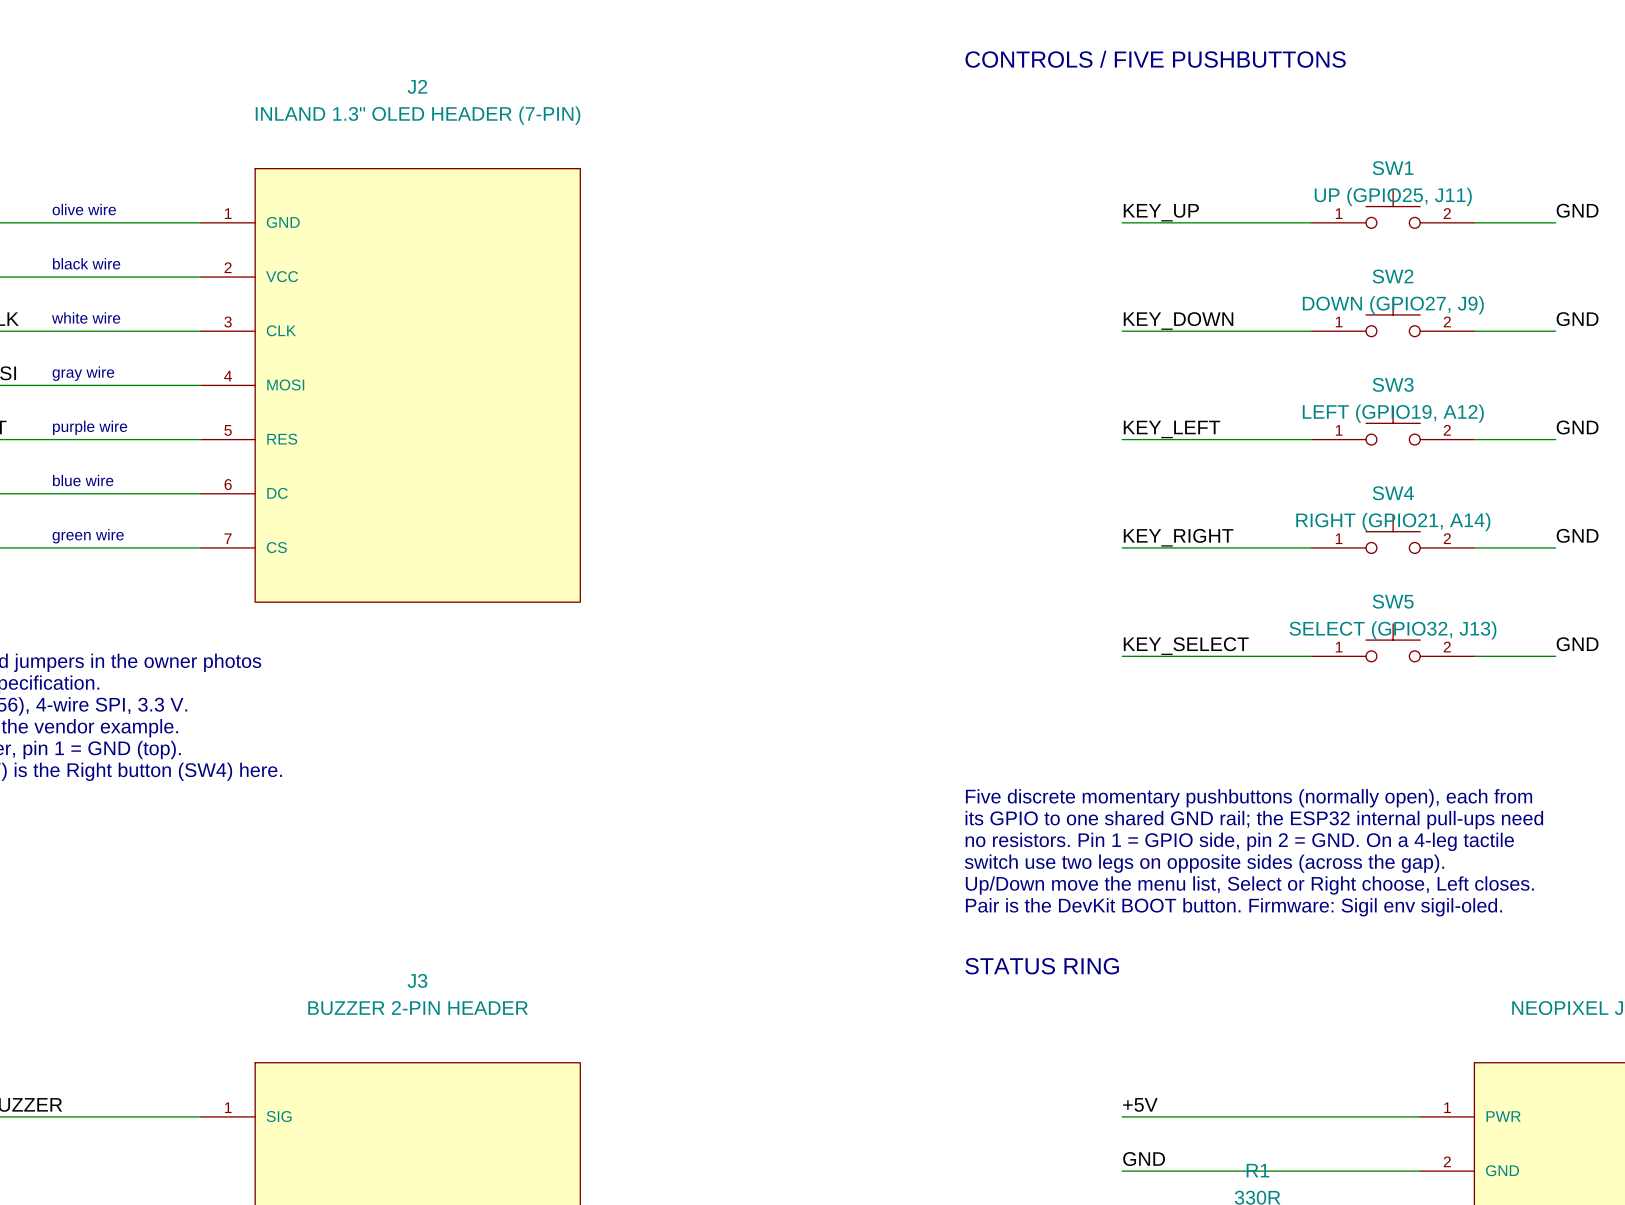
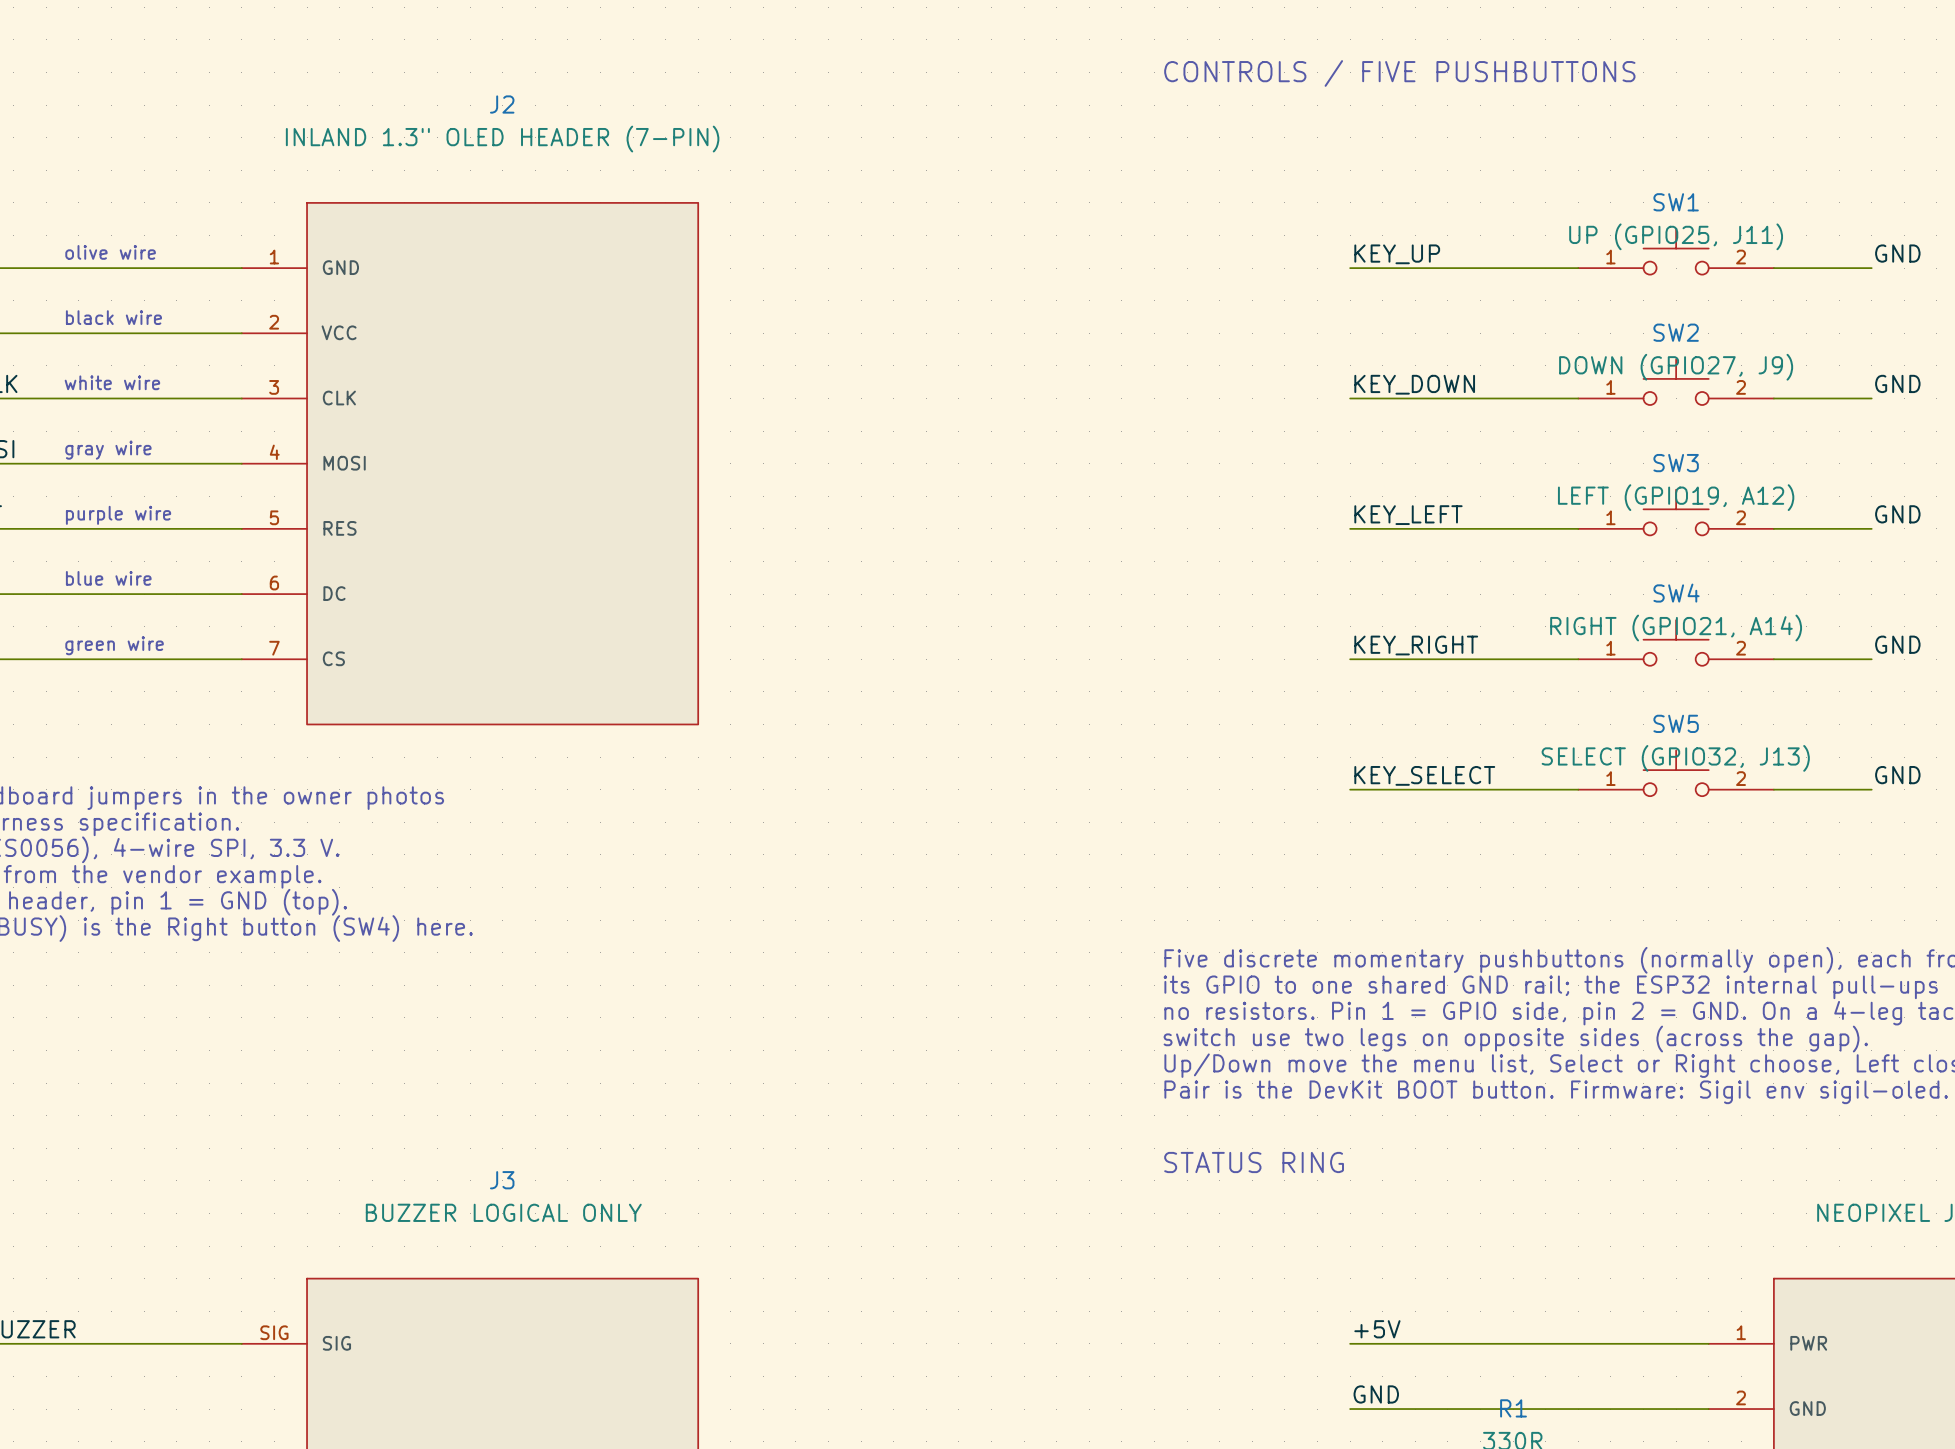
J3 value: BUZZER 2-PIN HEADER (418, 1008) -> BUZZER LOGICAL ONLY (503, 1212)
J3 pin number: 1 (228, 1107) -> SIG (274, 1332)

